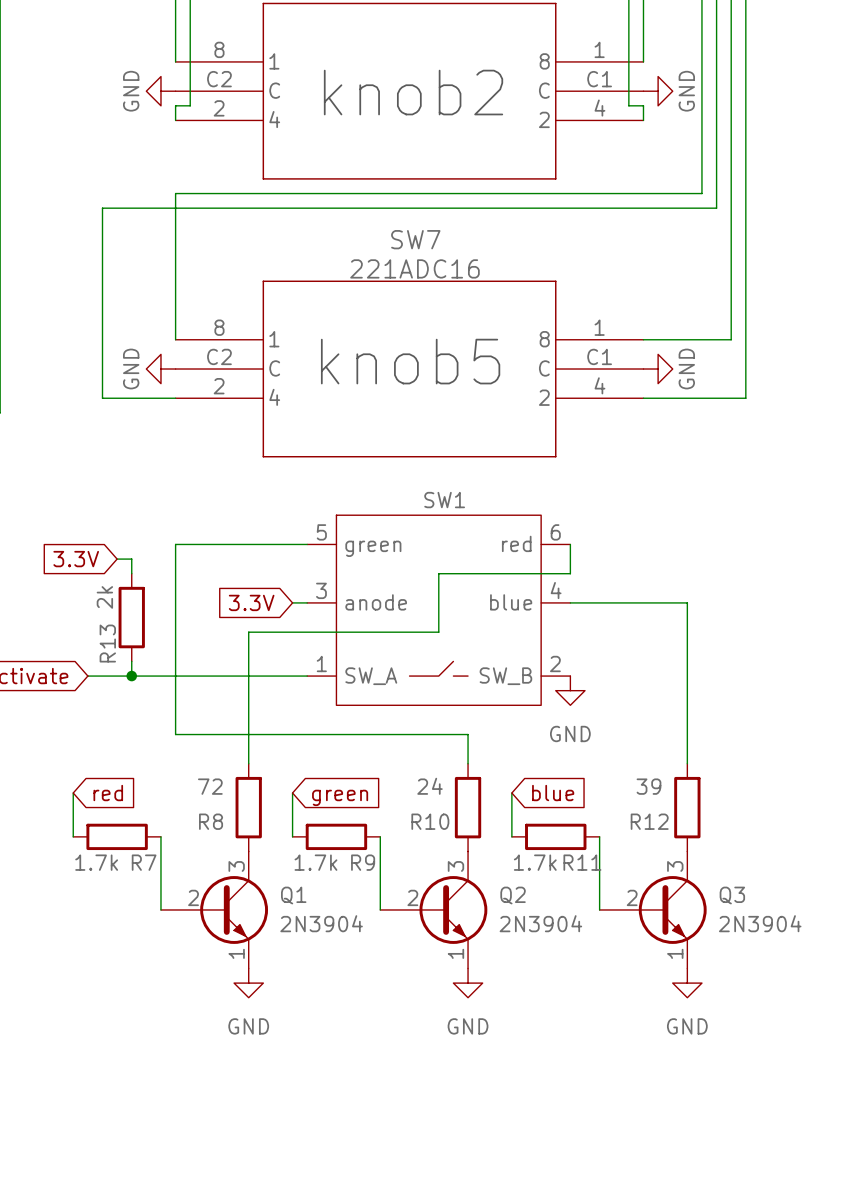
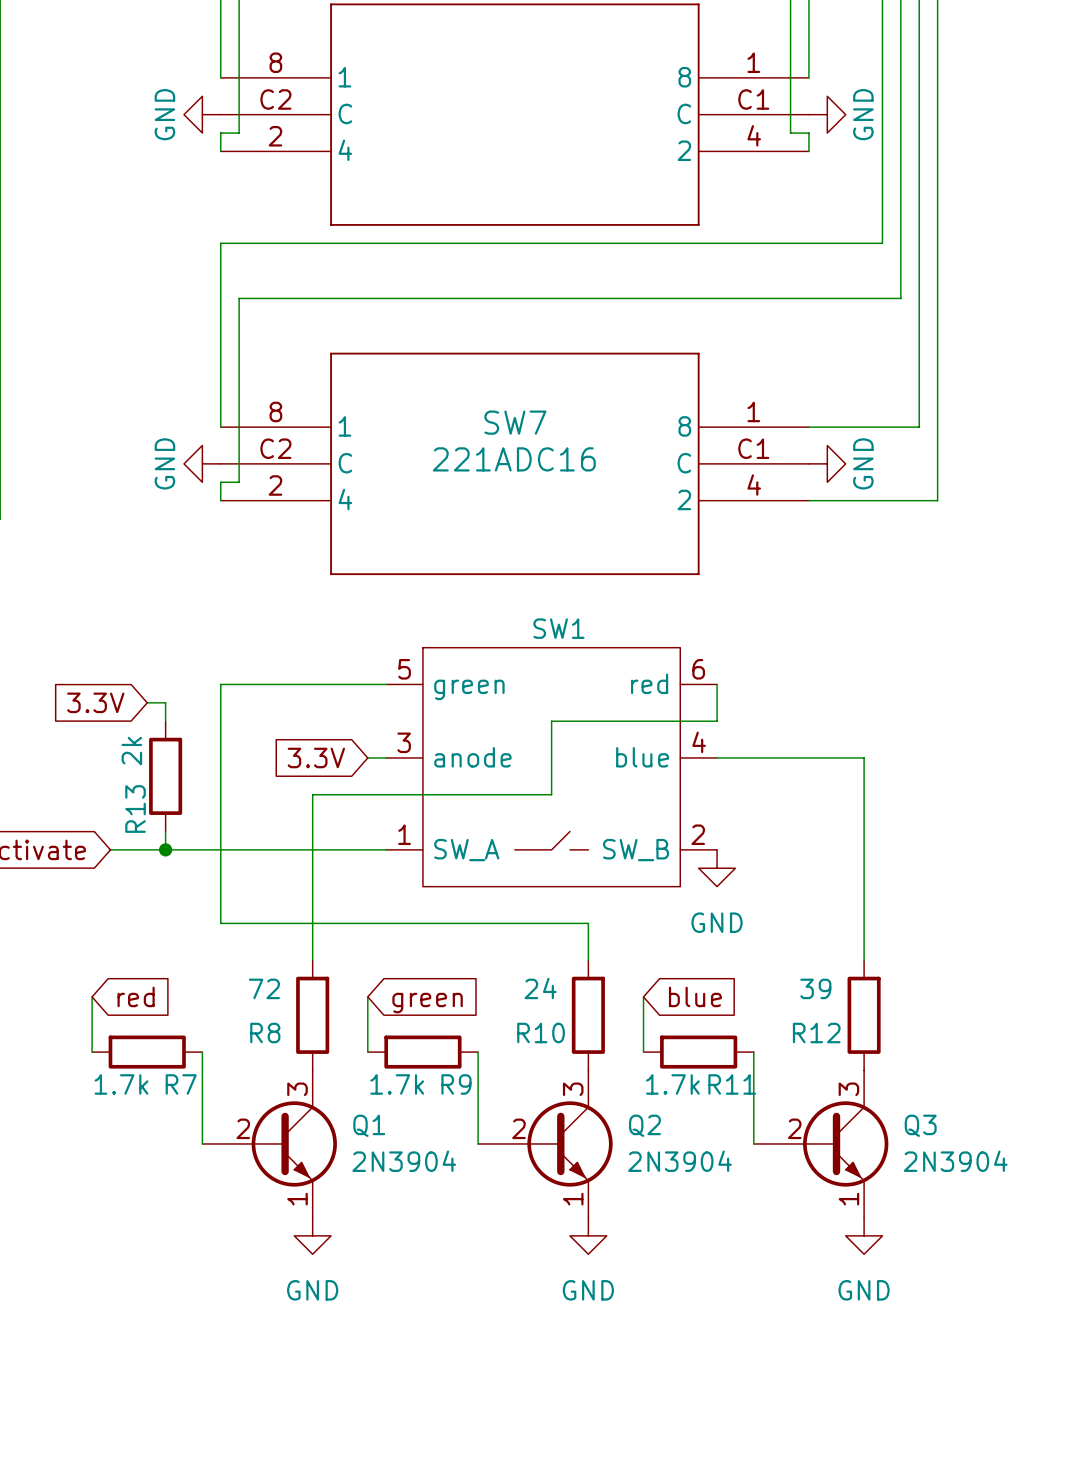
text: knob2 (413, 92) -> none
wire: (716, 208) (102, 208) (102, 398) (175, 398) -> (900, 261) (900, 298) (239, 298) (239, 482) (220, 482) (220, 500)
SW7 name position: SW7 (415, 239) -> SW7 (515, 422)
SW7 value position: 221ADC16 (414, 268) -> 221ADC16 (514, 459)
text: knob5 (410, 361) -> none

